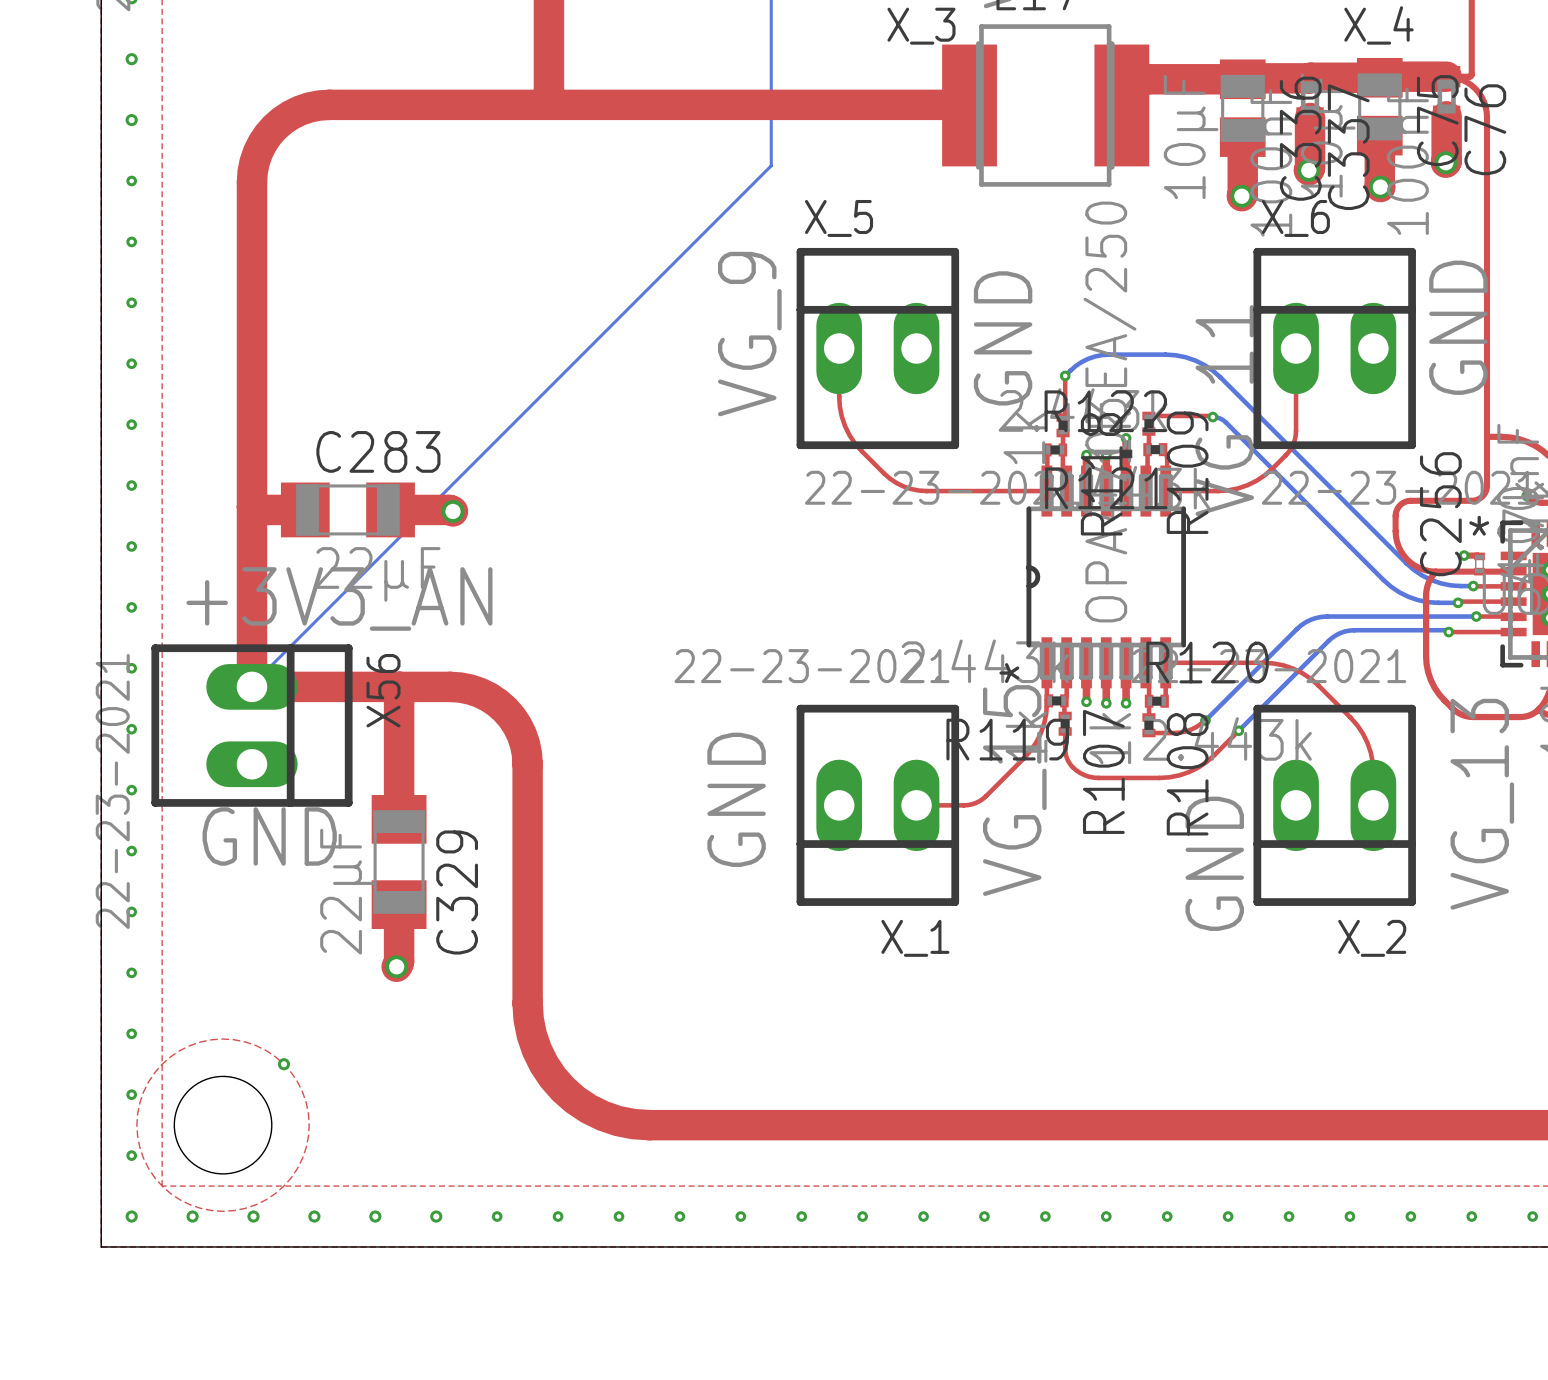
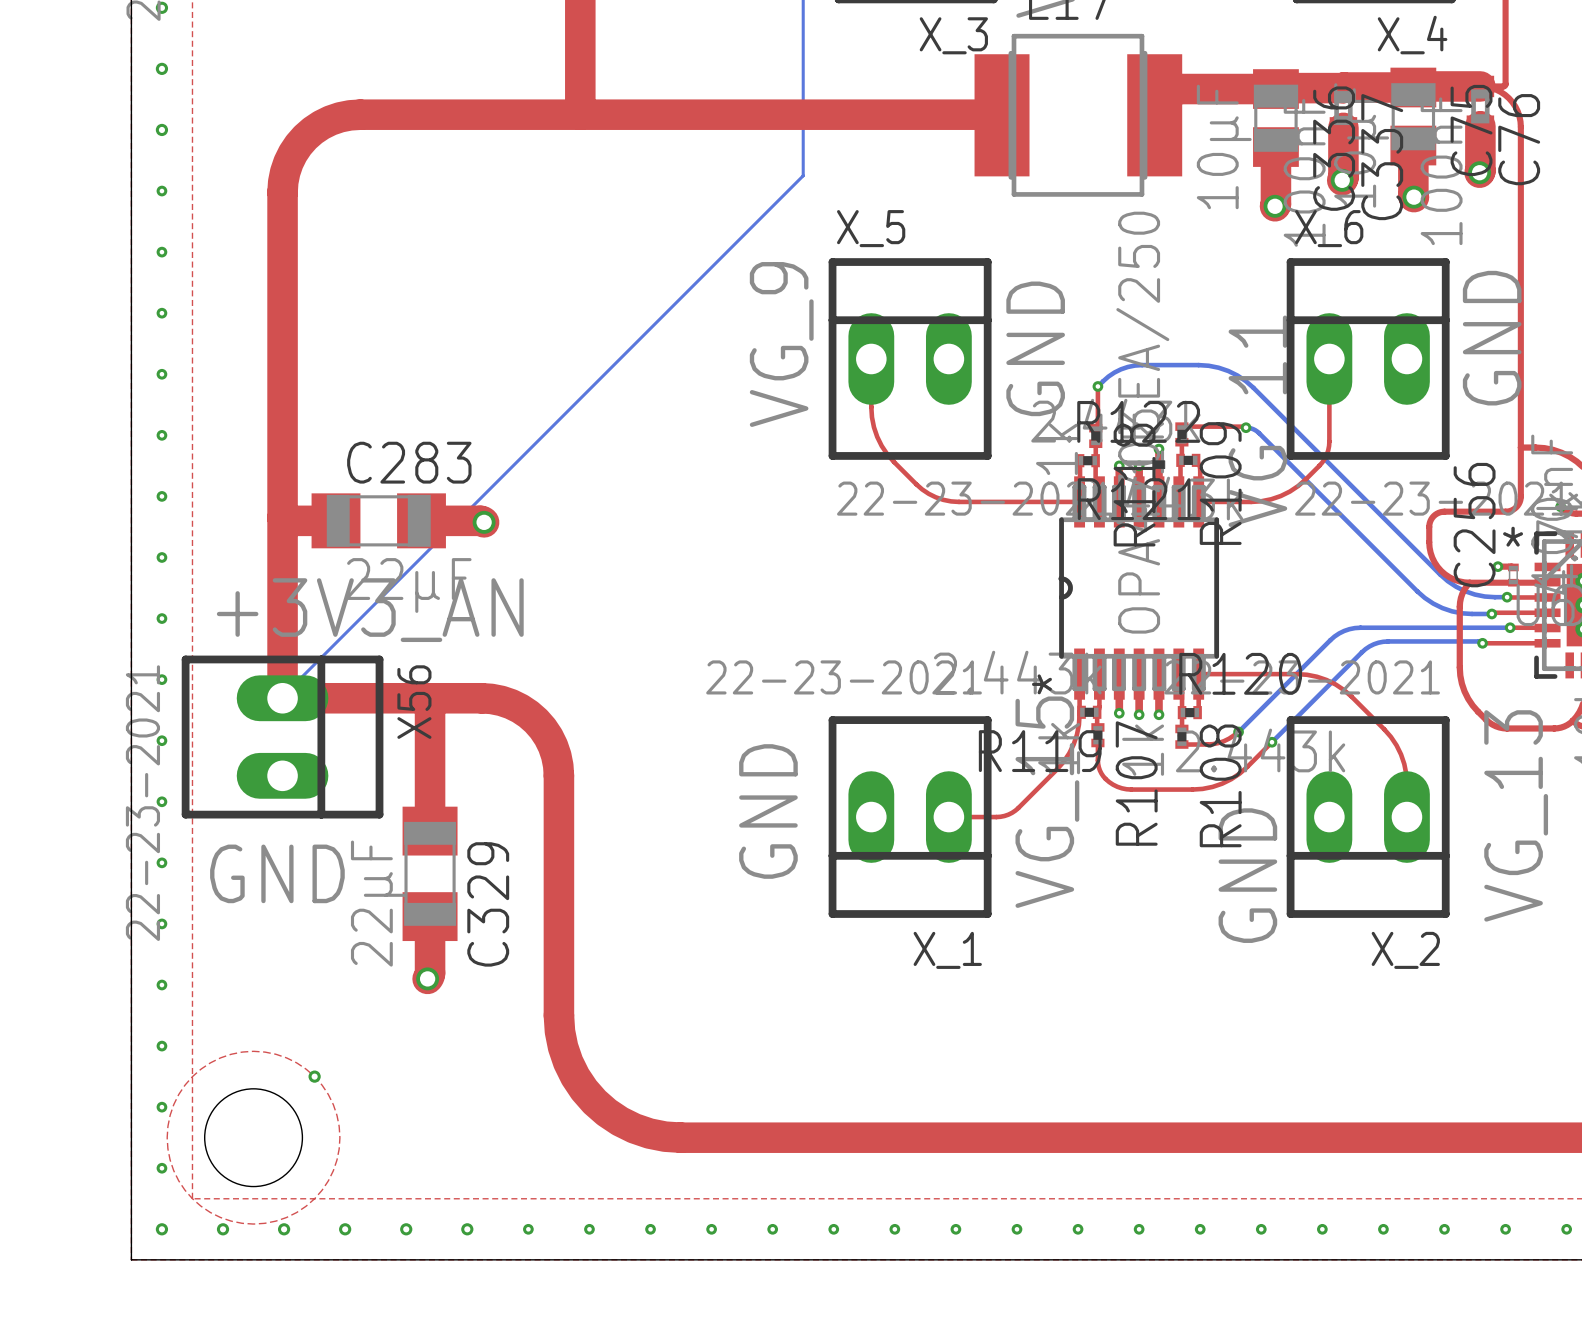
text position: GND (269, 836) -> GND (277, 873)

